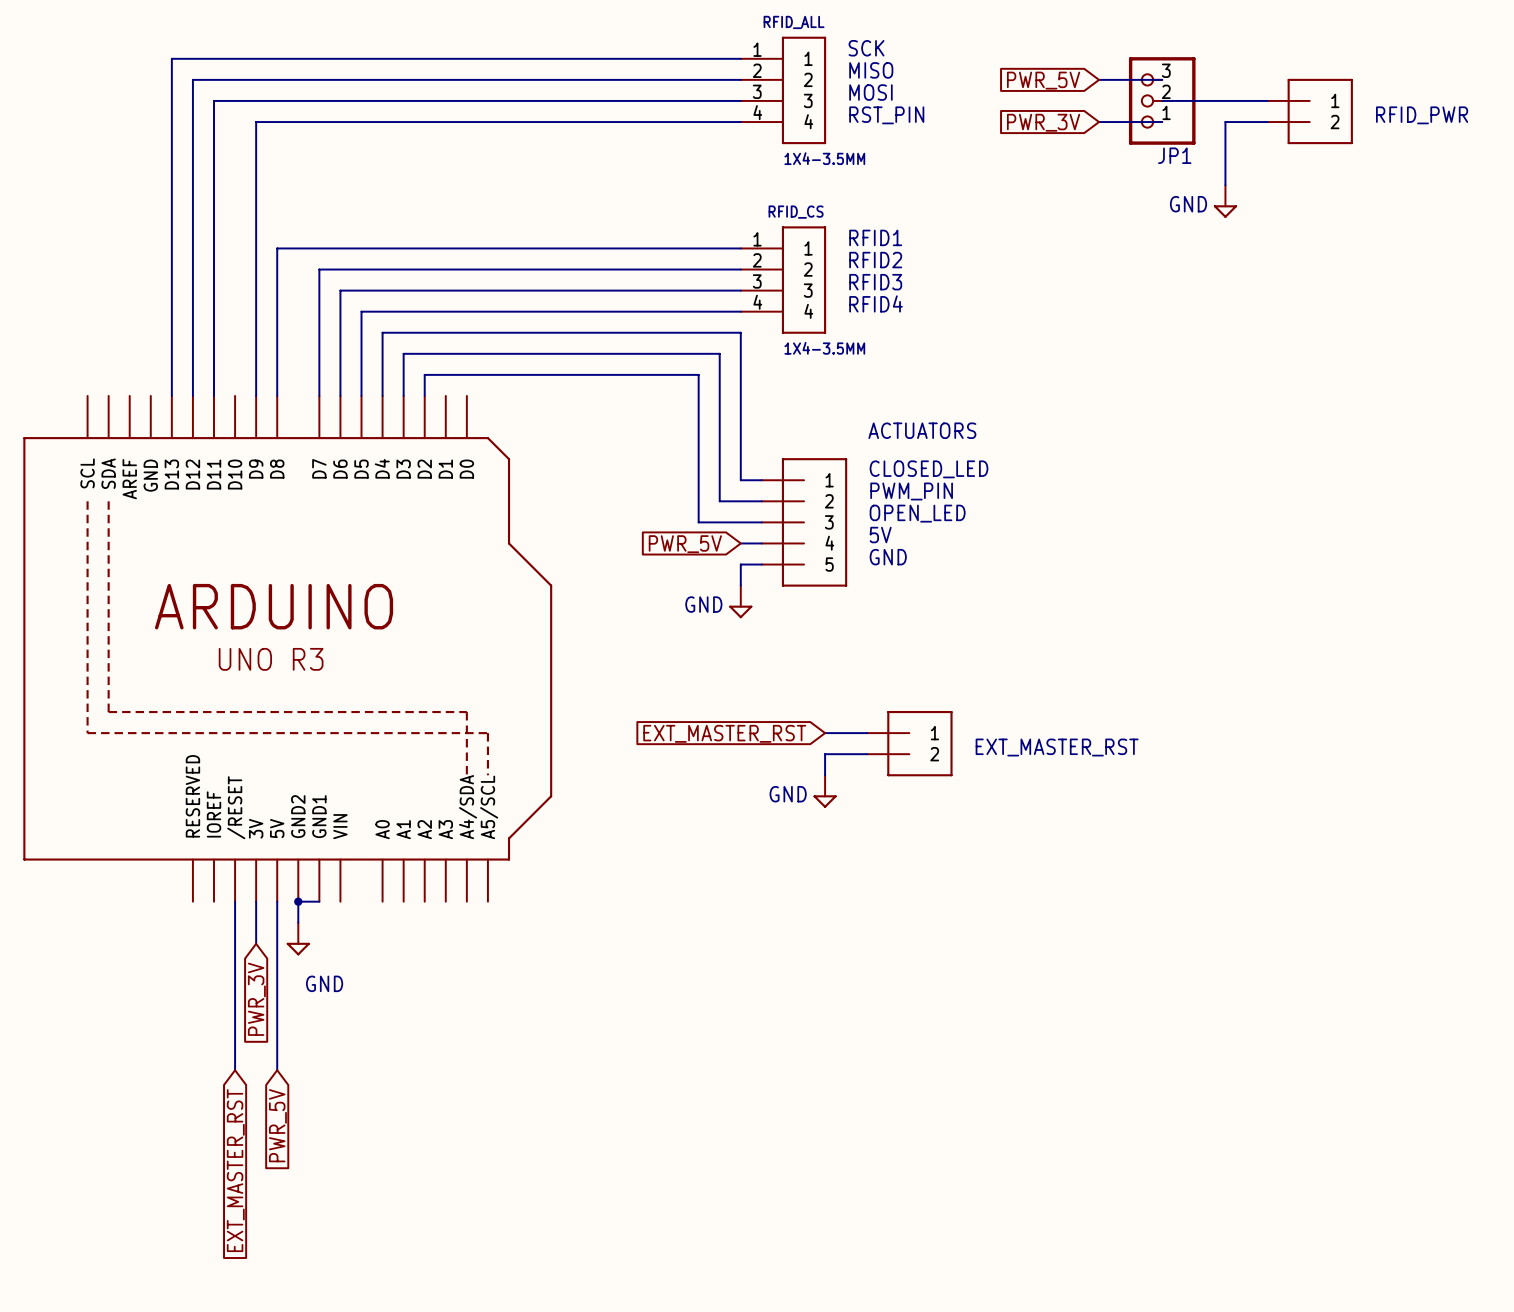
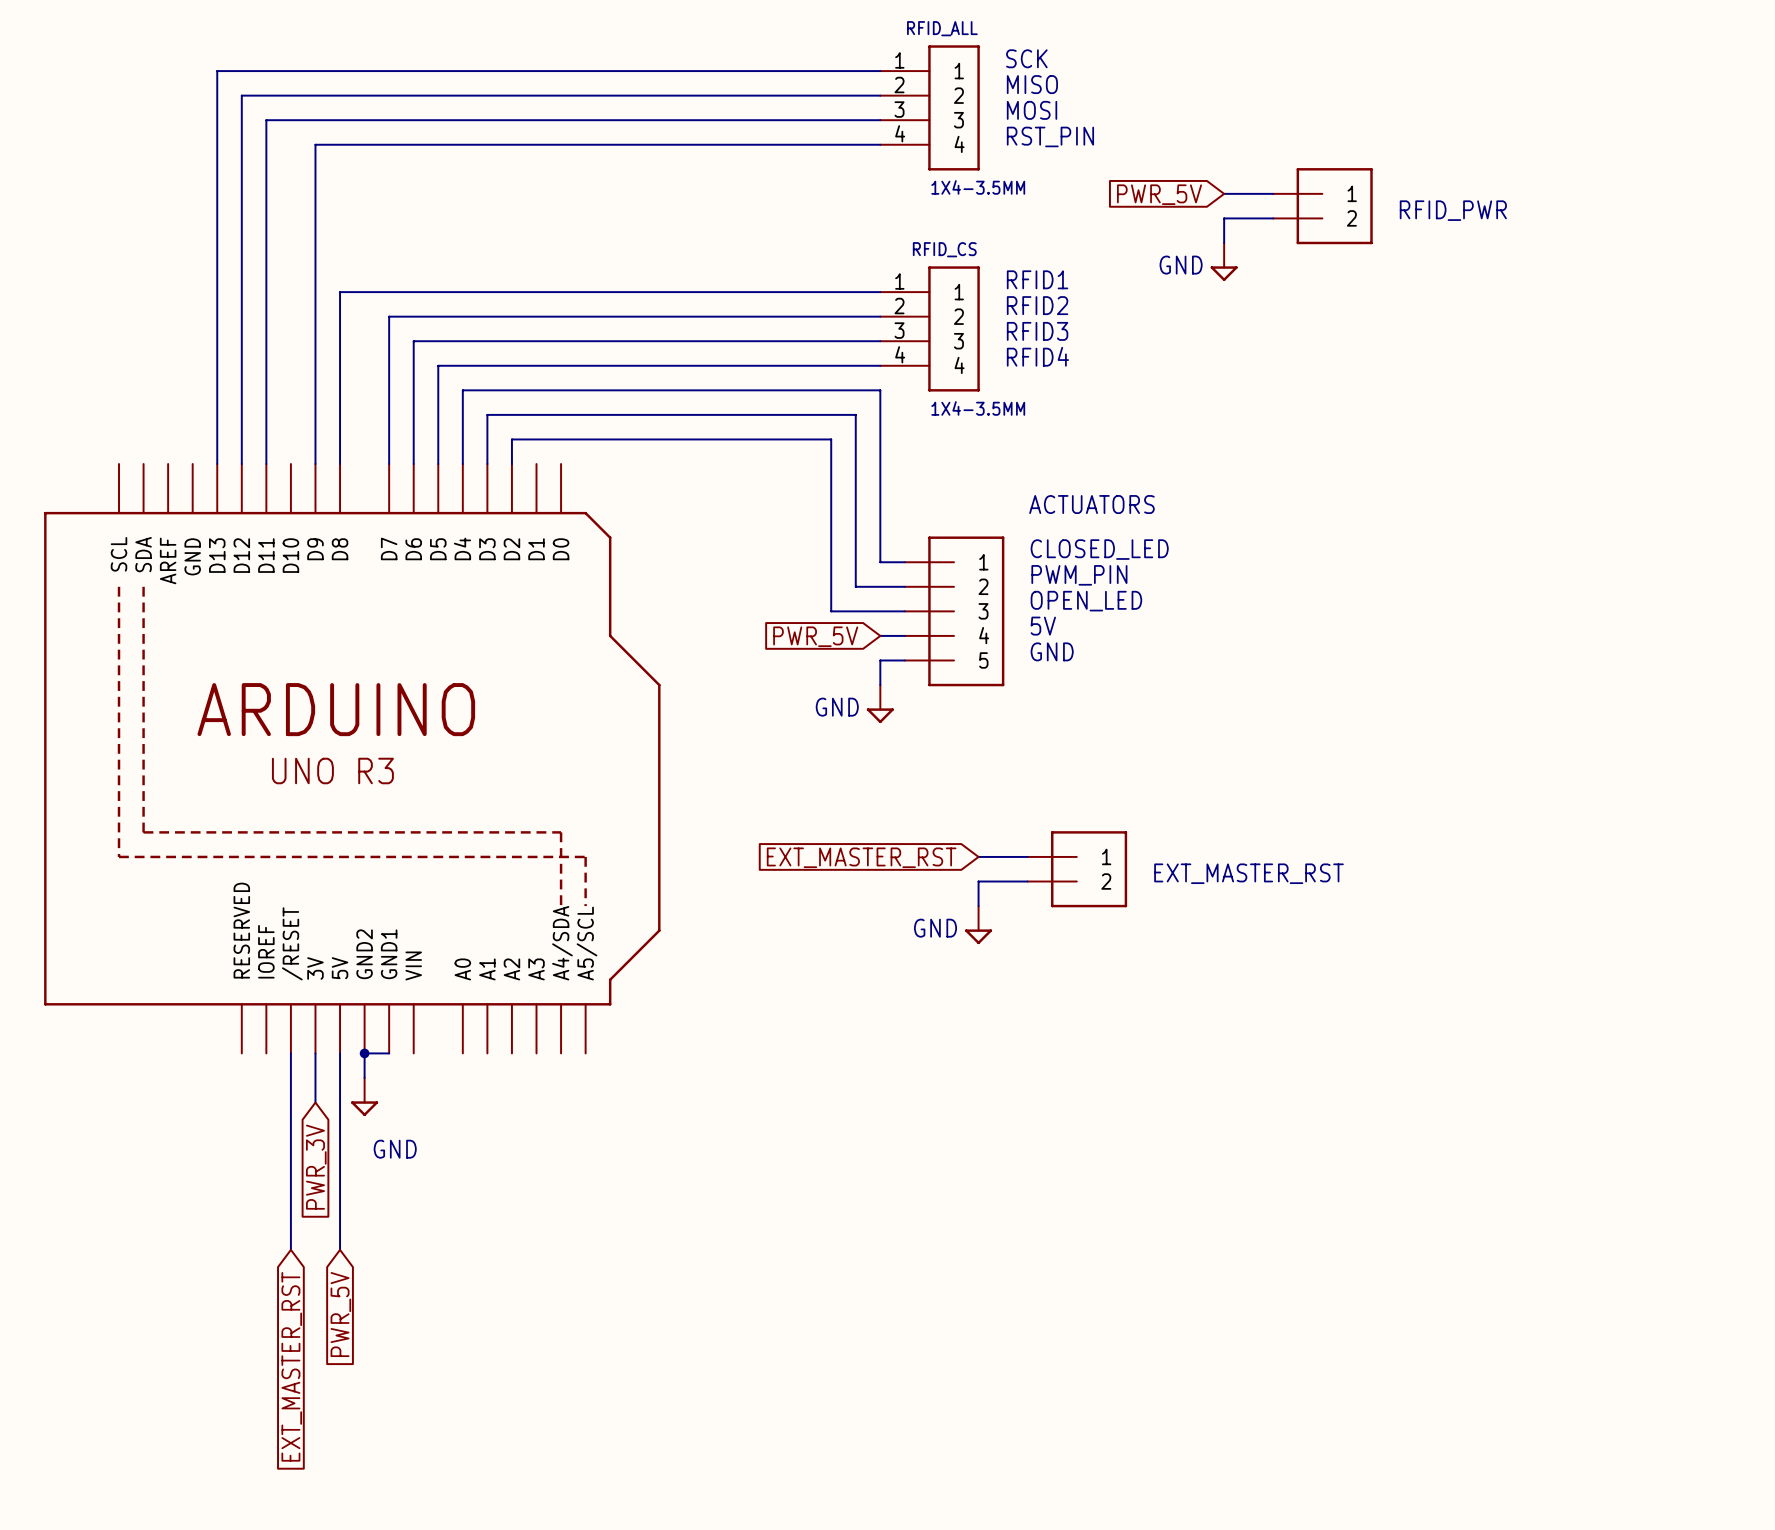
wire: (1099, 79) (1162, 79) -> none
global label position: PWR_5V (1043, 80) -> PWR_5V (1159, 194)
wire: (1162, 100) (1267, 100) -> none
JP1: (1162, 100) -> none
part position: (1310, 111) -> (1323, 206)
text position: RFID_PWR (1422, 115) -> RFID_PWR (1453, 210)
global label: PWR_3V (1043, 122) -> none
wire: (1099, 122) (1162, 122) -> none
wire: (1267, 122) (1225, 122) (1225, 185) -> none
wire: none -> (1224, 193) (1273, 193)
wire: none -> (1273, 218) (1224, 218) (1224, 242)
power symbol position: GND (1225, 201) -> GND (1224, 262)

